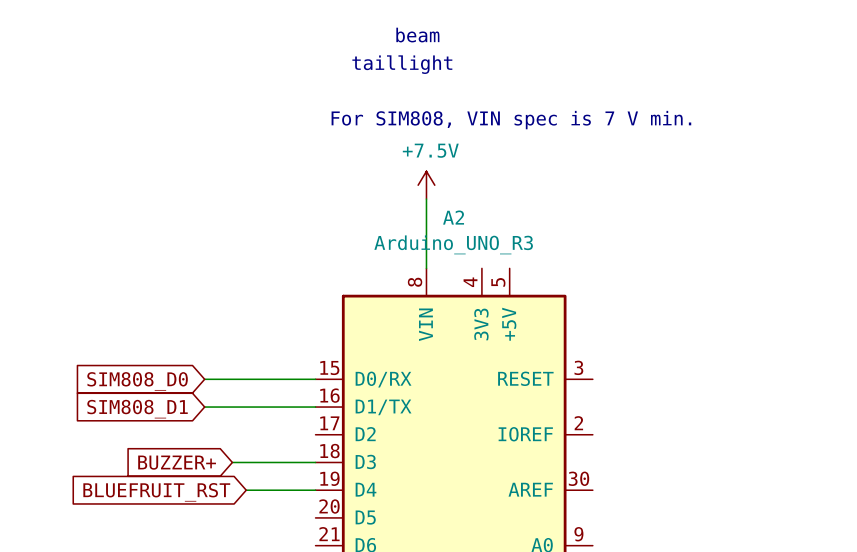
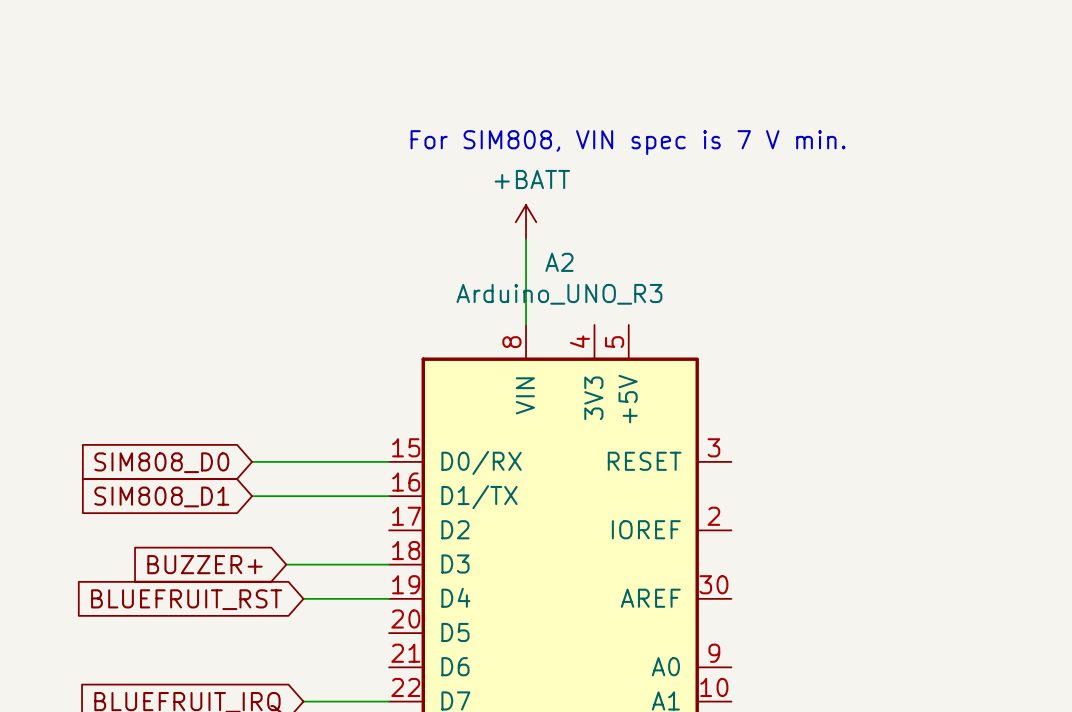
text: beam (417, 35) -> none
text: taillight (402, 64) -> none
power symbol: +7.5V (426, 185) -> +BATT (526, 222)

